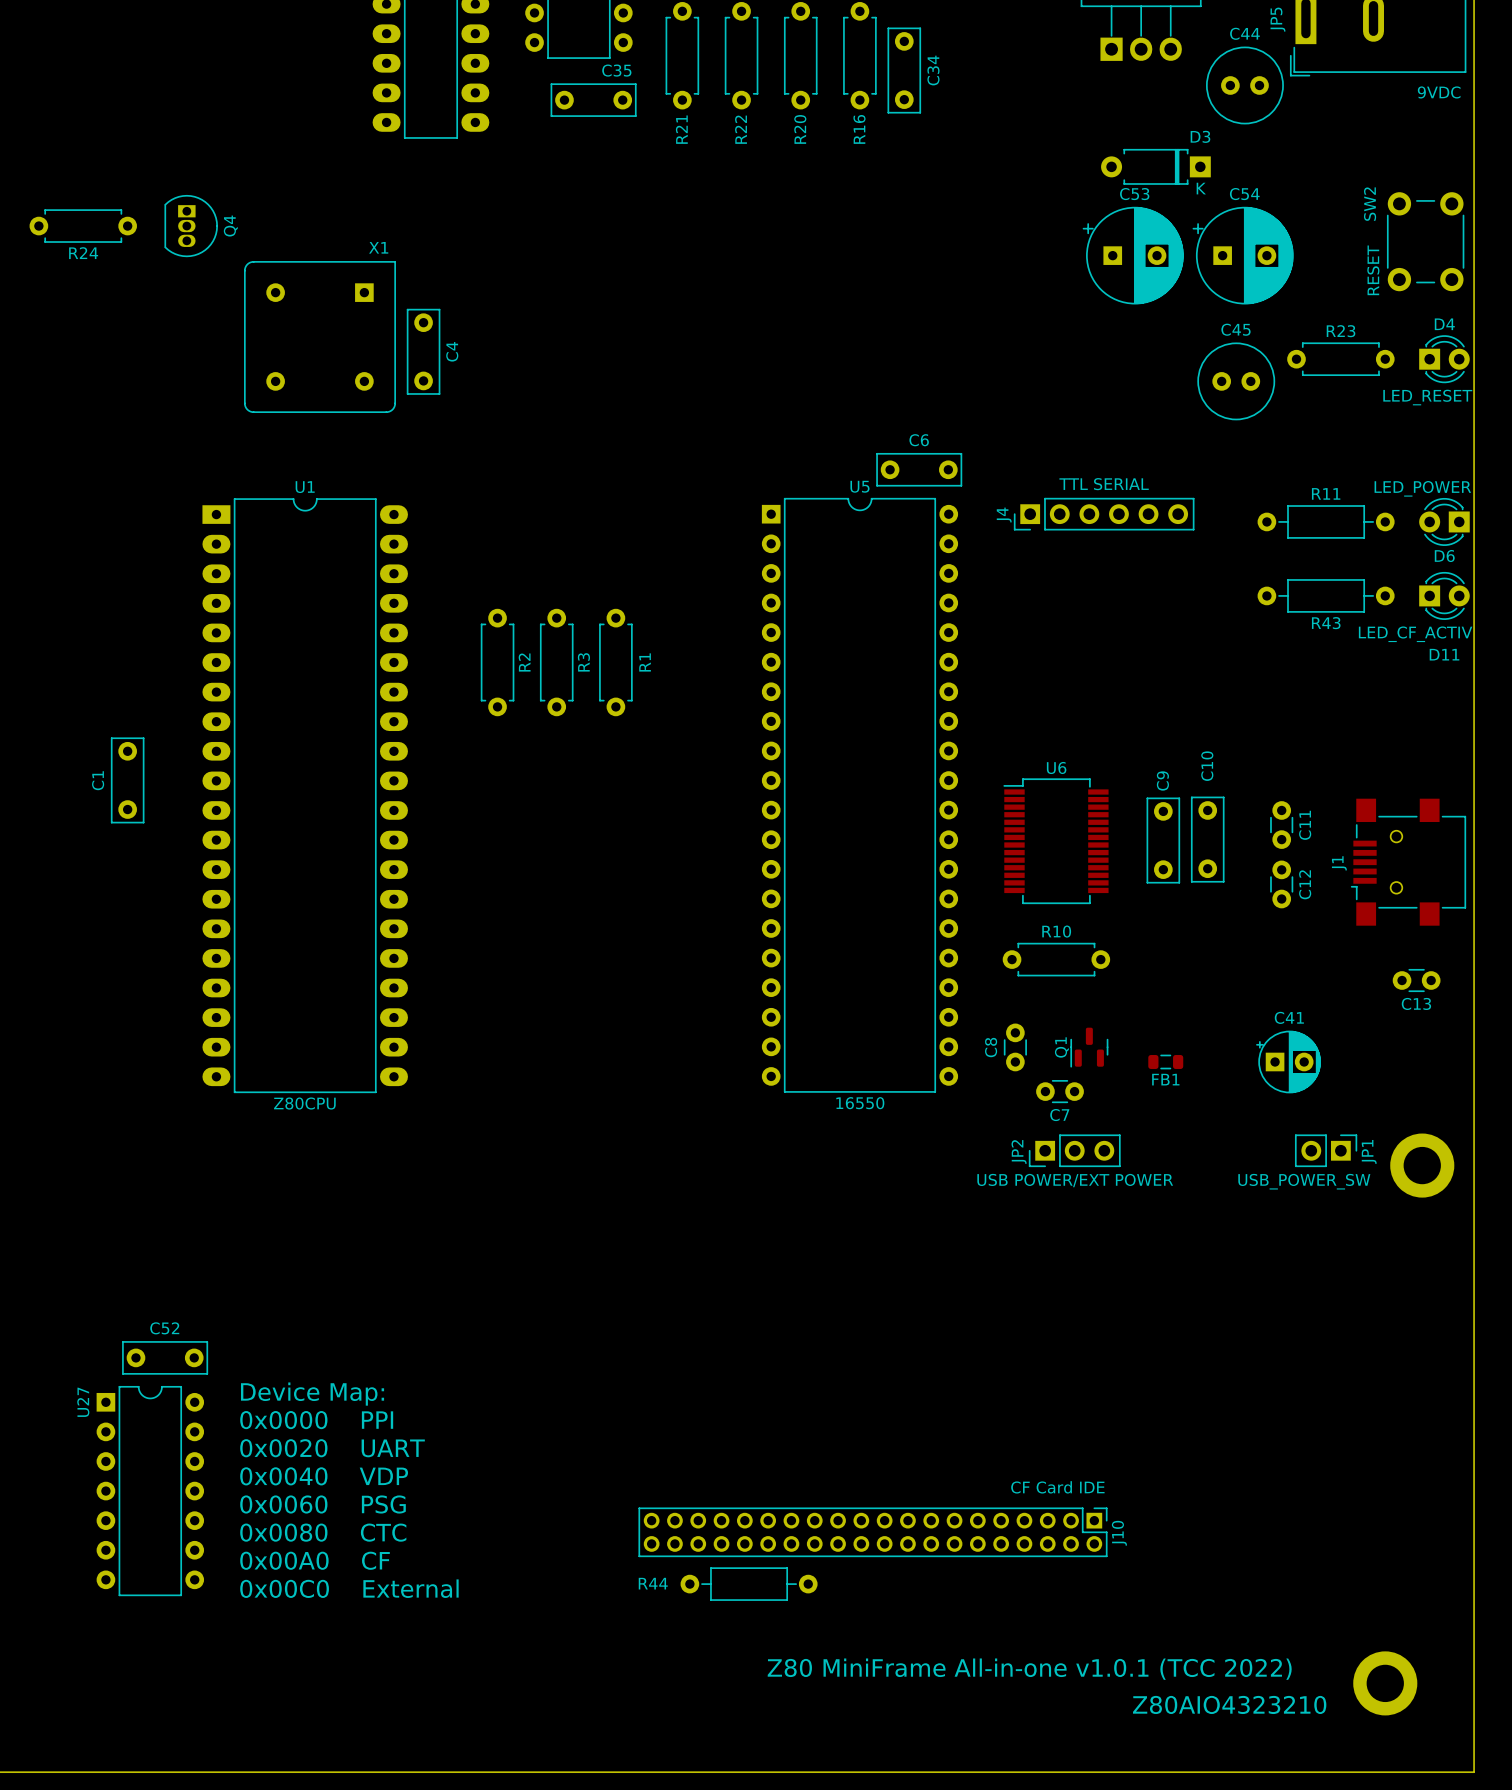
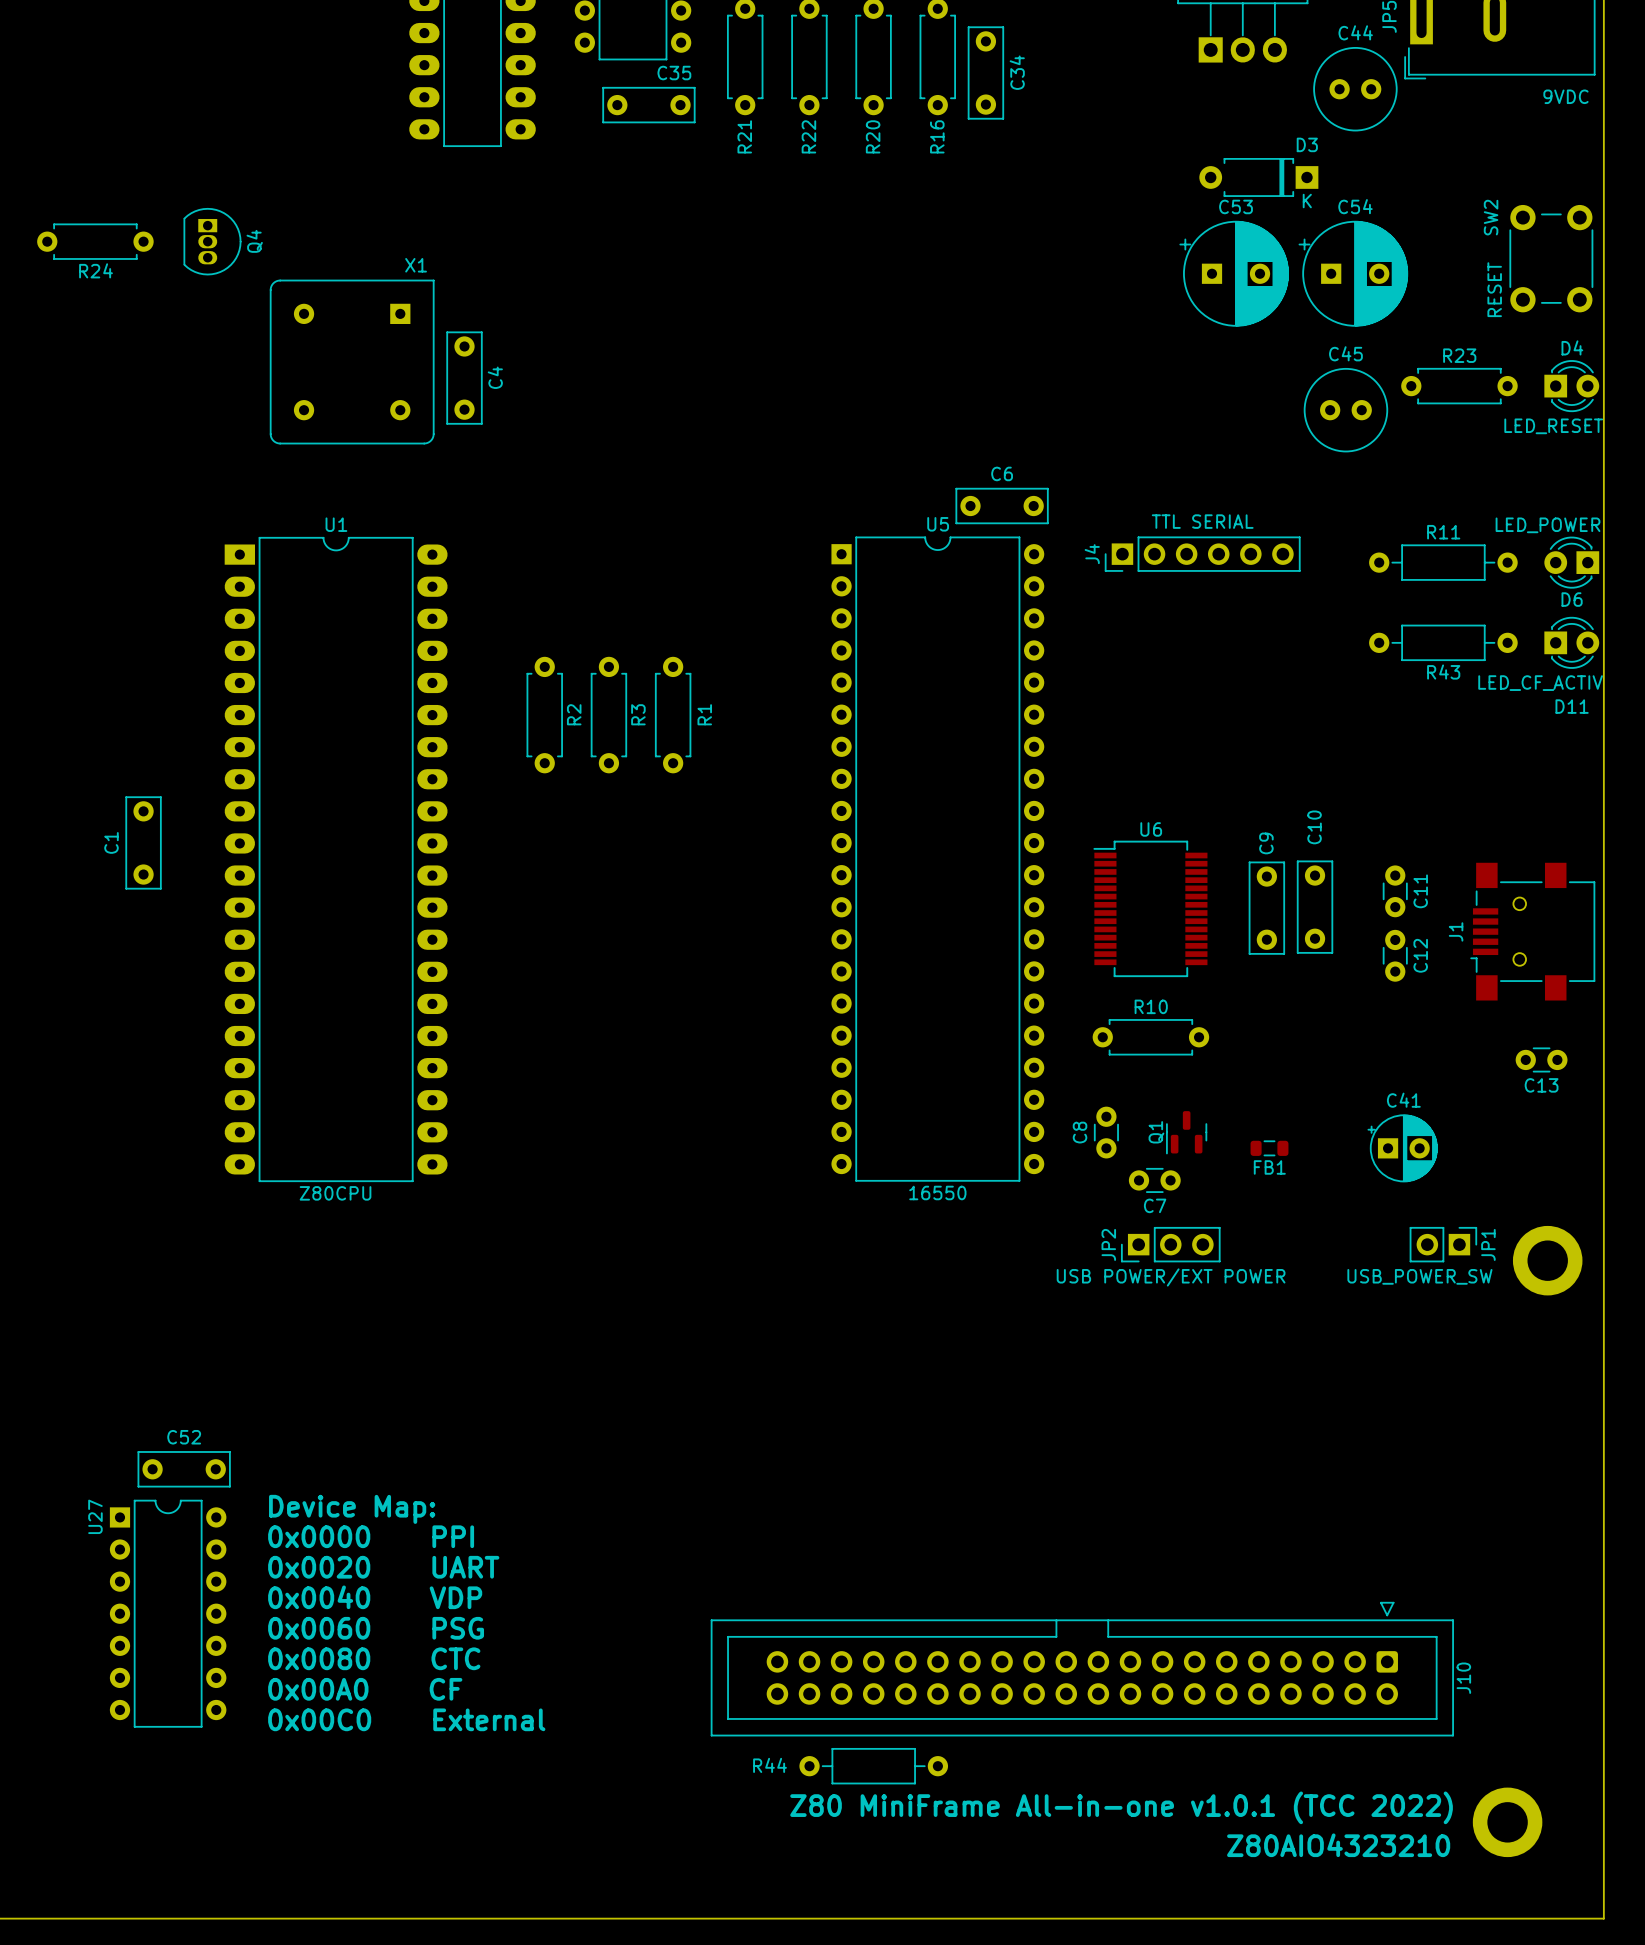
J10 value: CF Card IDE (1057, 1487) -> none
J10 footprint: [638, 1507, 1108, 1558] -> [710, 1601, 1454, 1737]
J10 name position: J10 (1119, 1533) -> J10 (1463, 1678)
R44 position: (749, 1584) -> (873, 1766)

